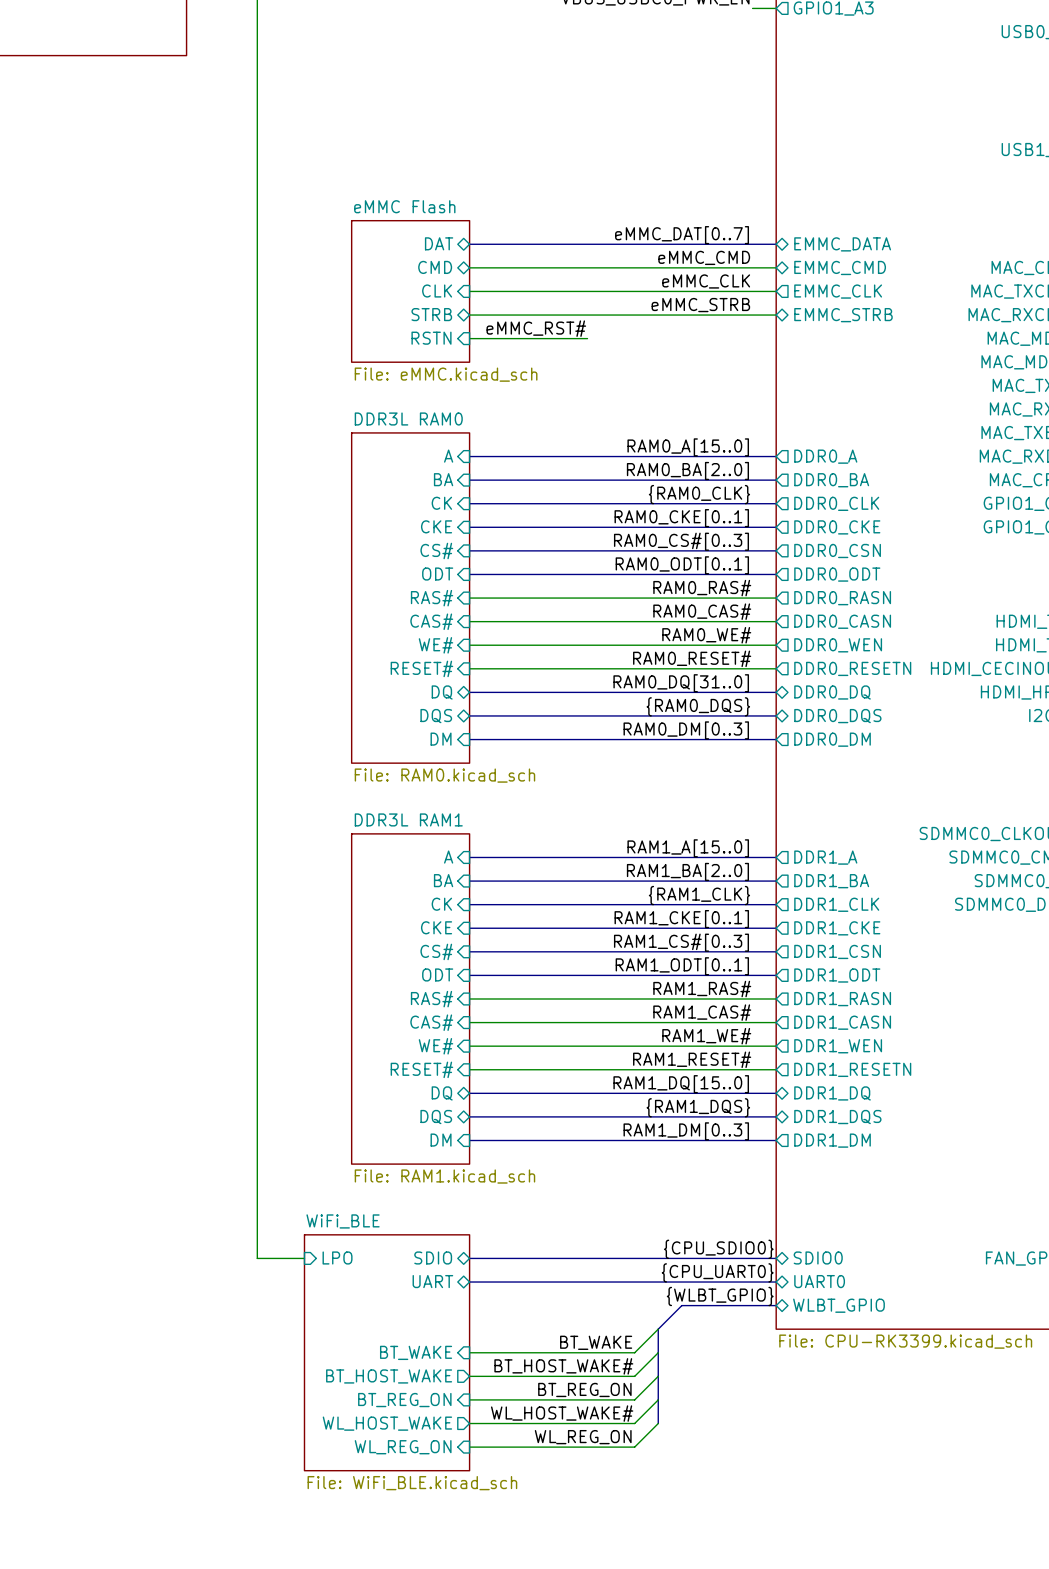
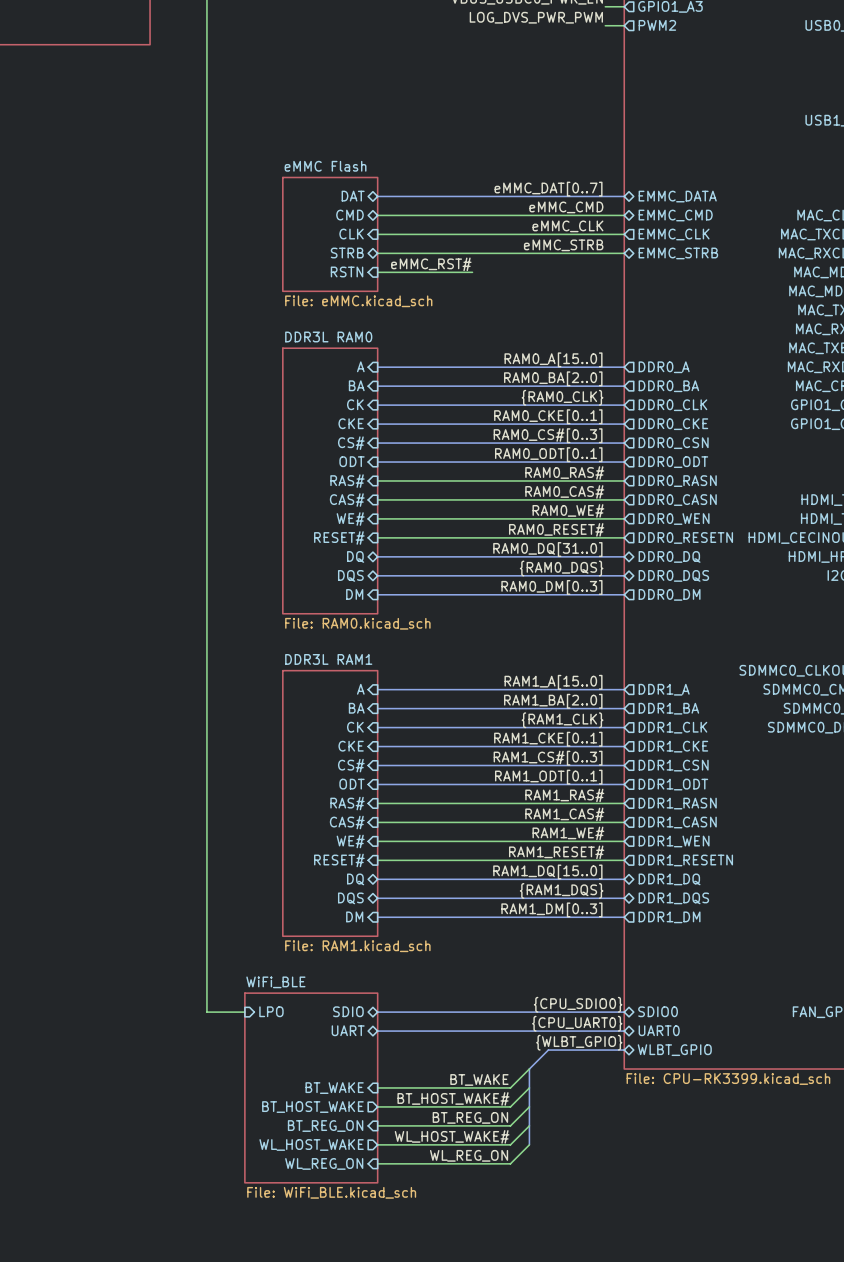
label: none -> LOG_DVS_PWR_PWM (536, 17)
sheet pin: none -> PWM2 (657, 25)
wire: none -> (605, 25) (624, 25)

